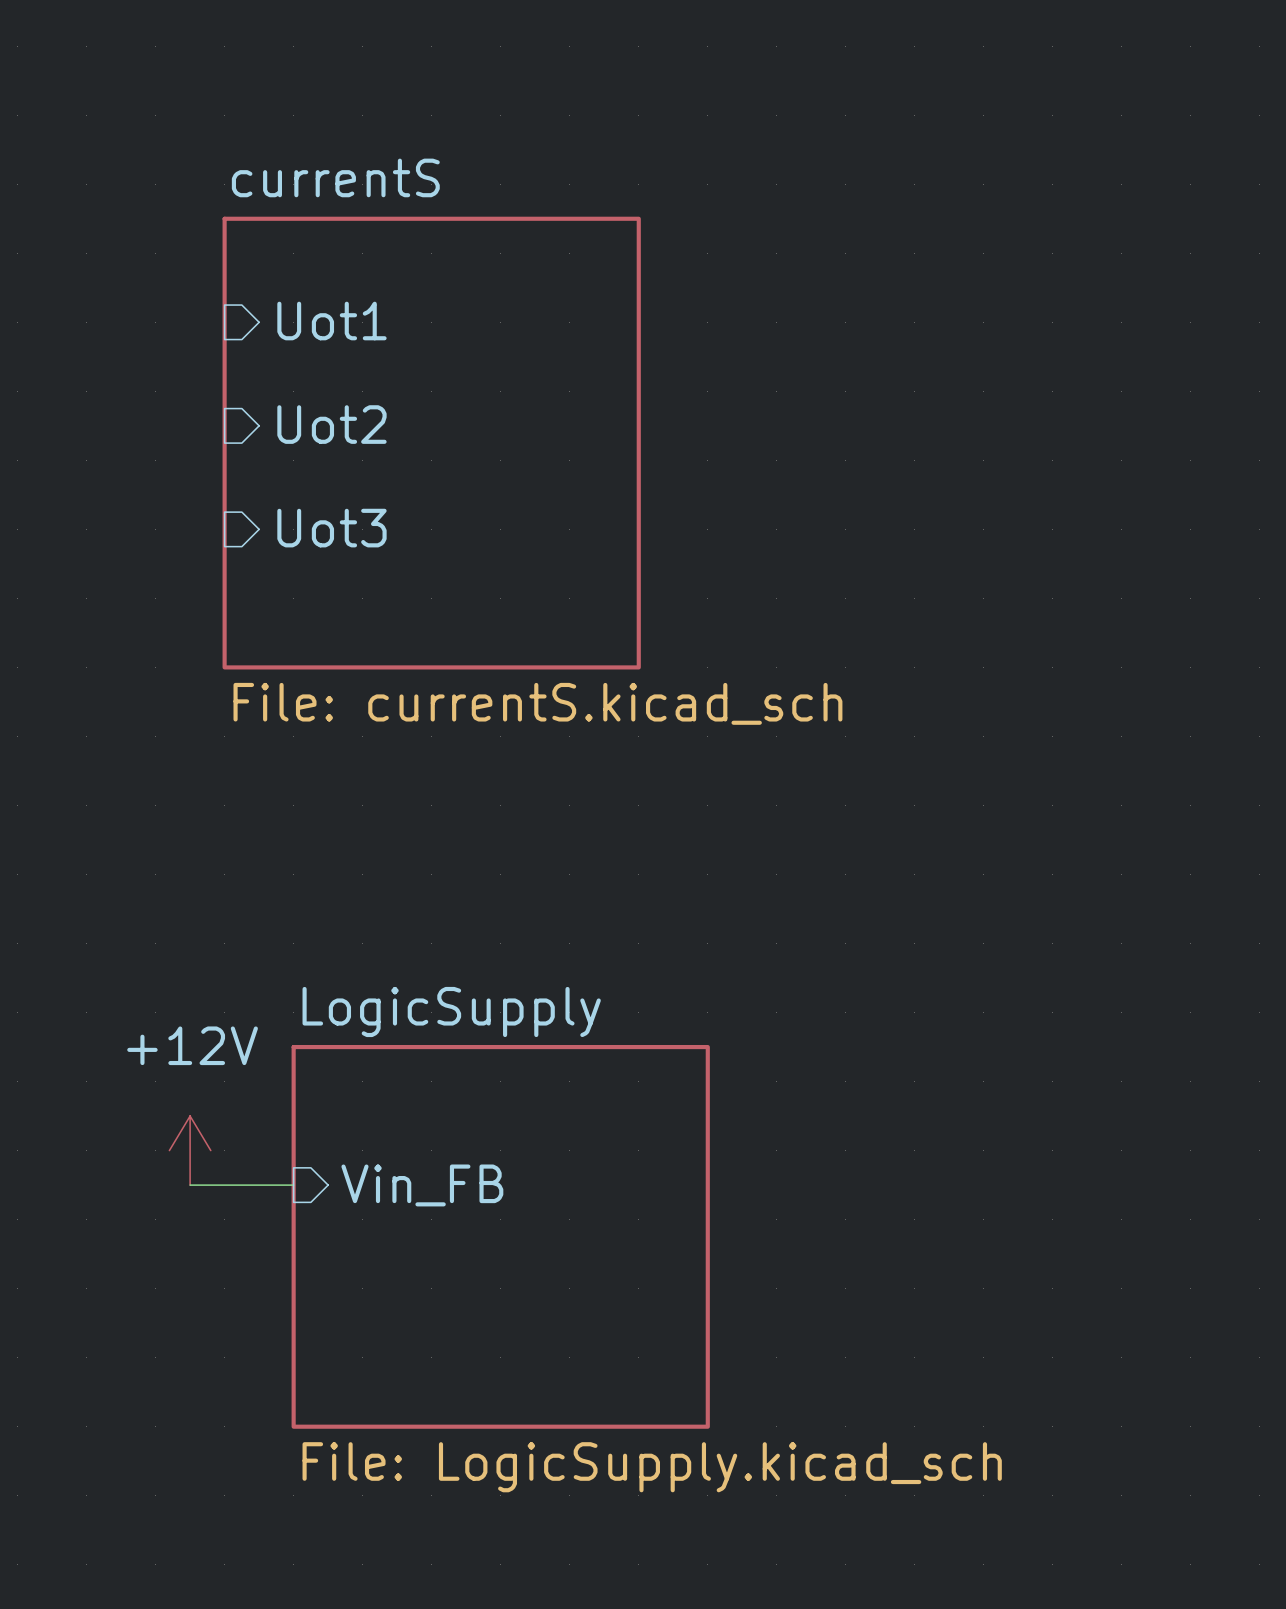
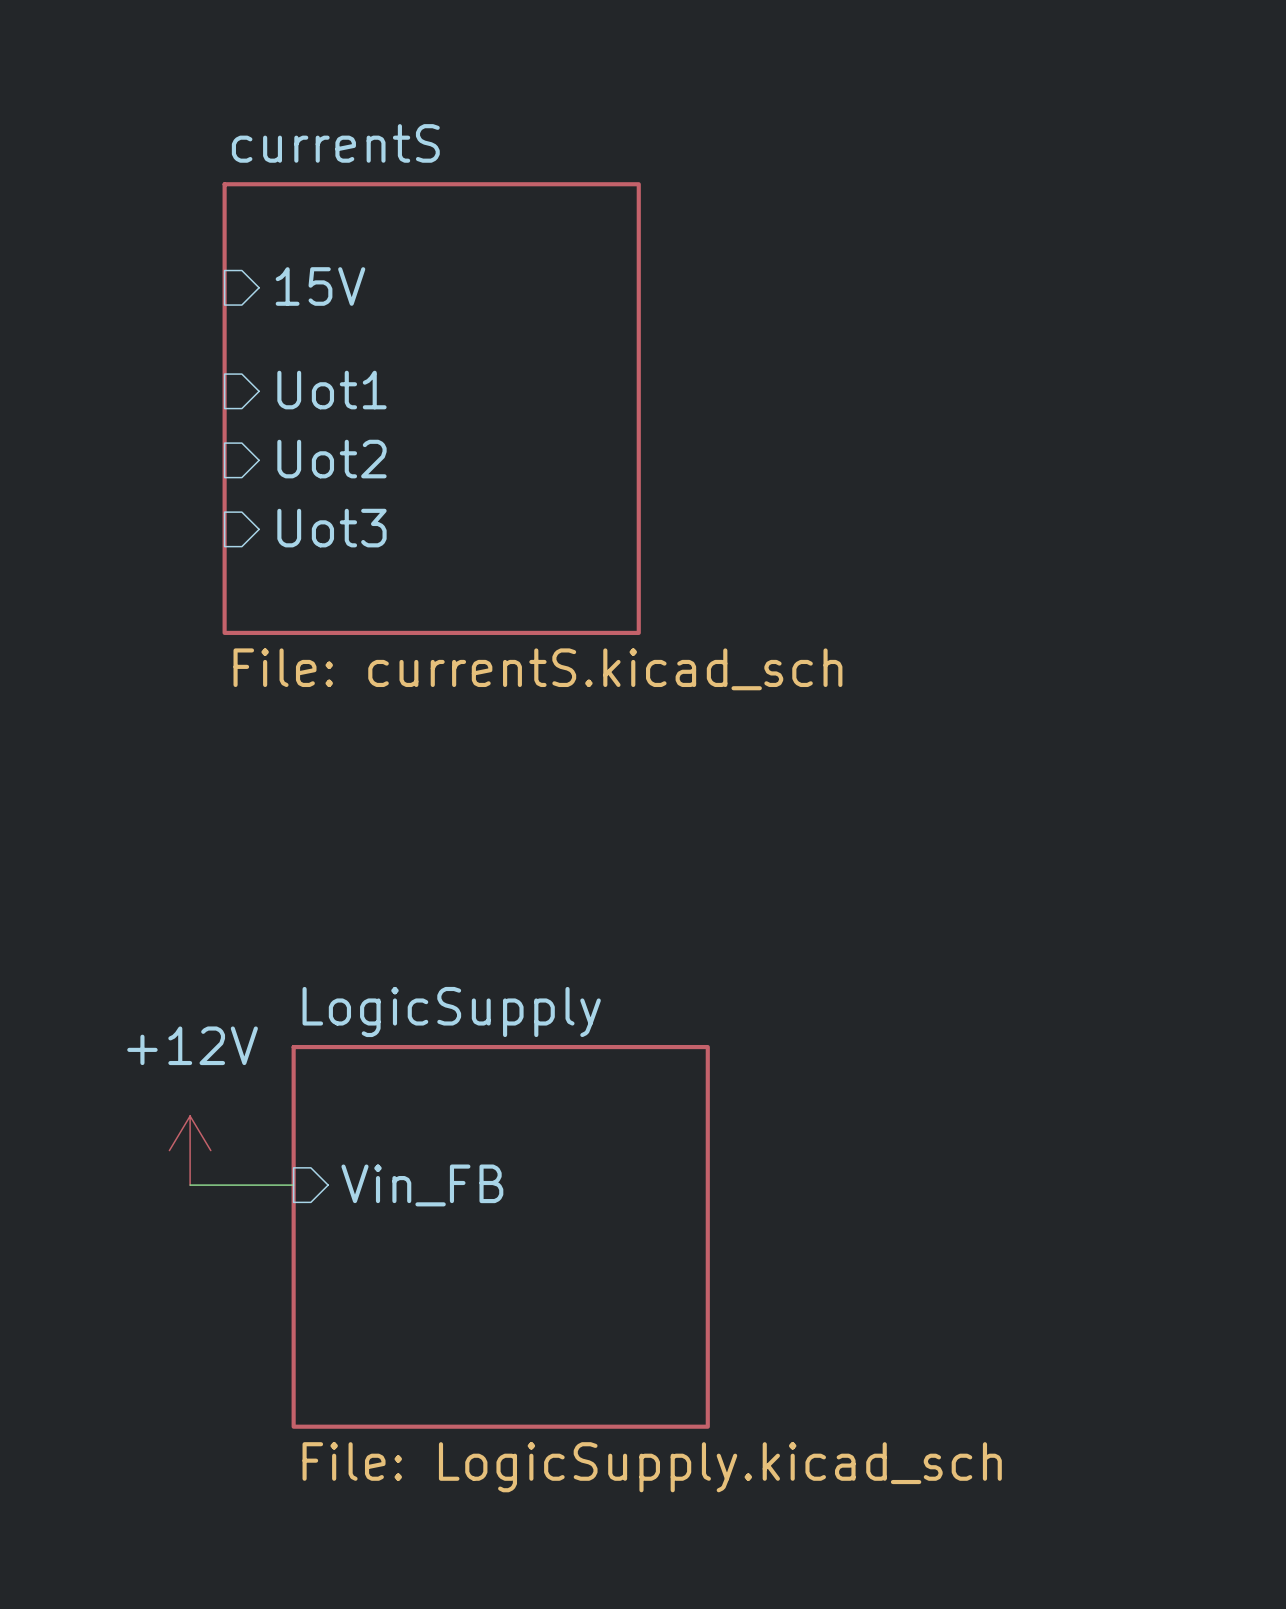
sheet pin: none -> 15V (320, 286)
sheet pin position: Uot1 (331, 321) -> Uot1 (331, 390)
sheet pin position: Uot2 (331, 424) -> Uot2 (331, 459)
sheet currentS position: (431, 443) -> (431, 408)

